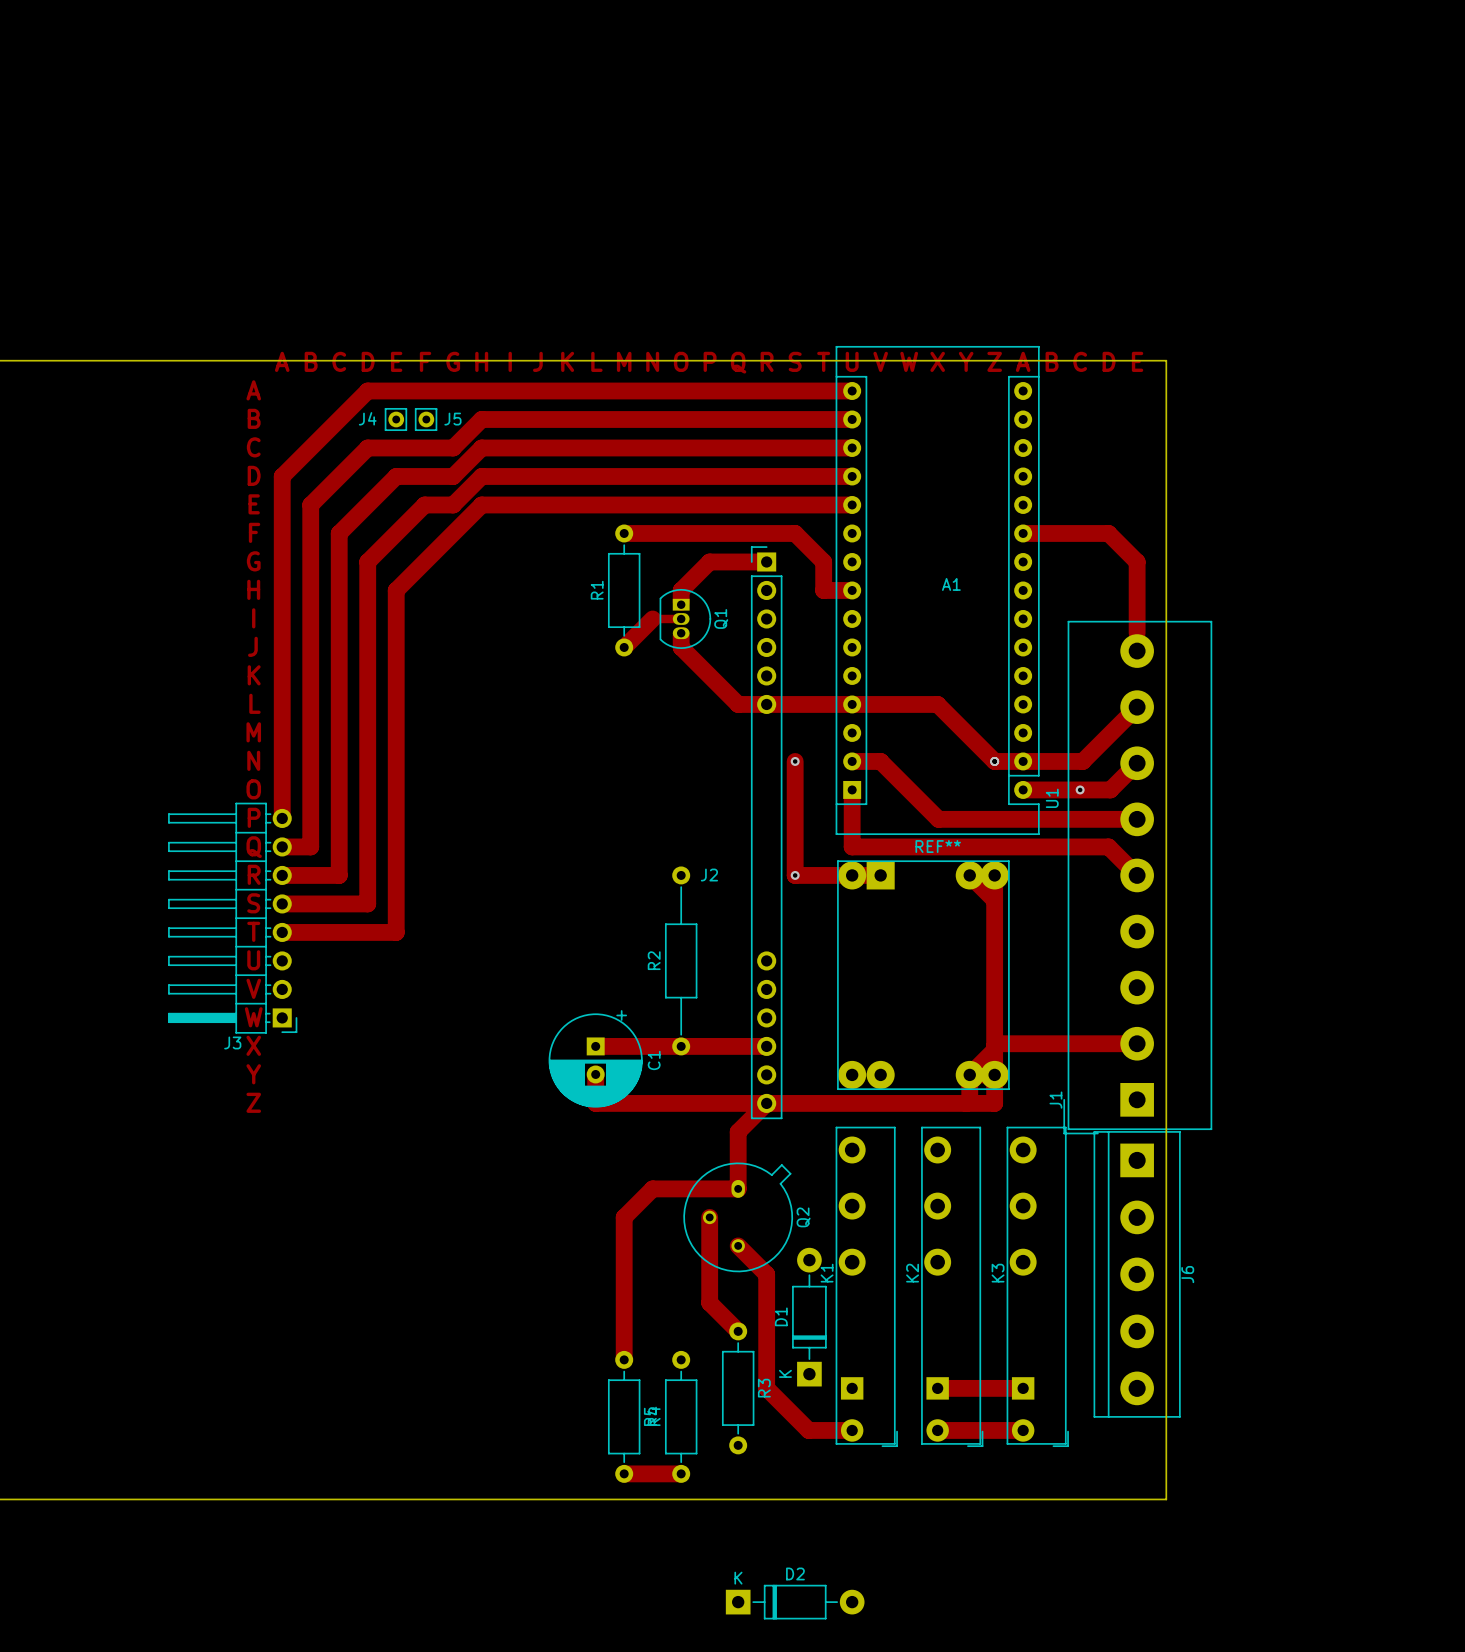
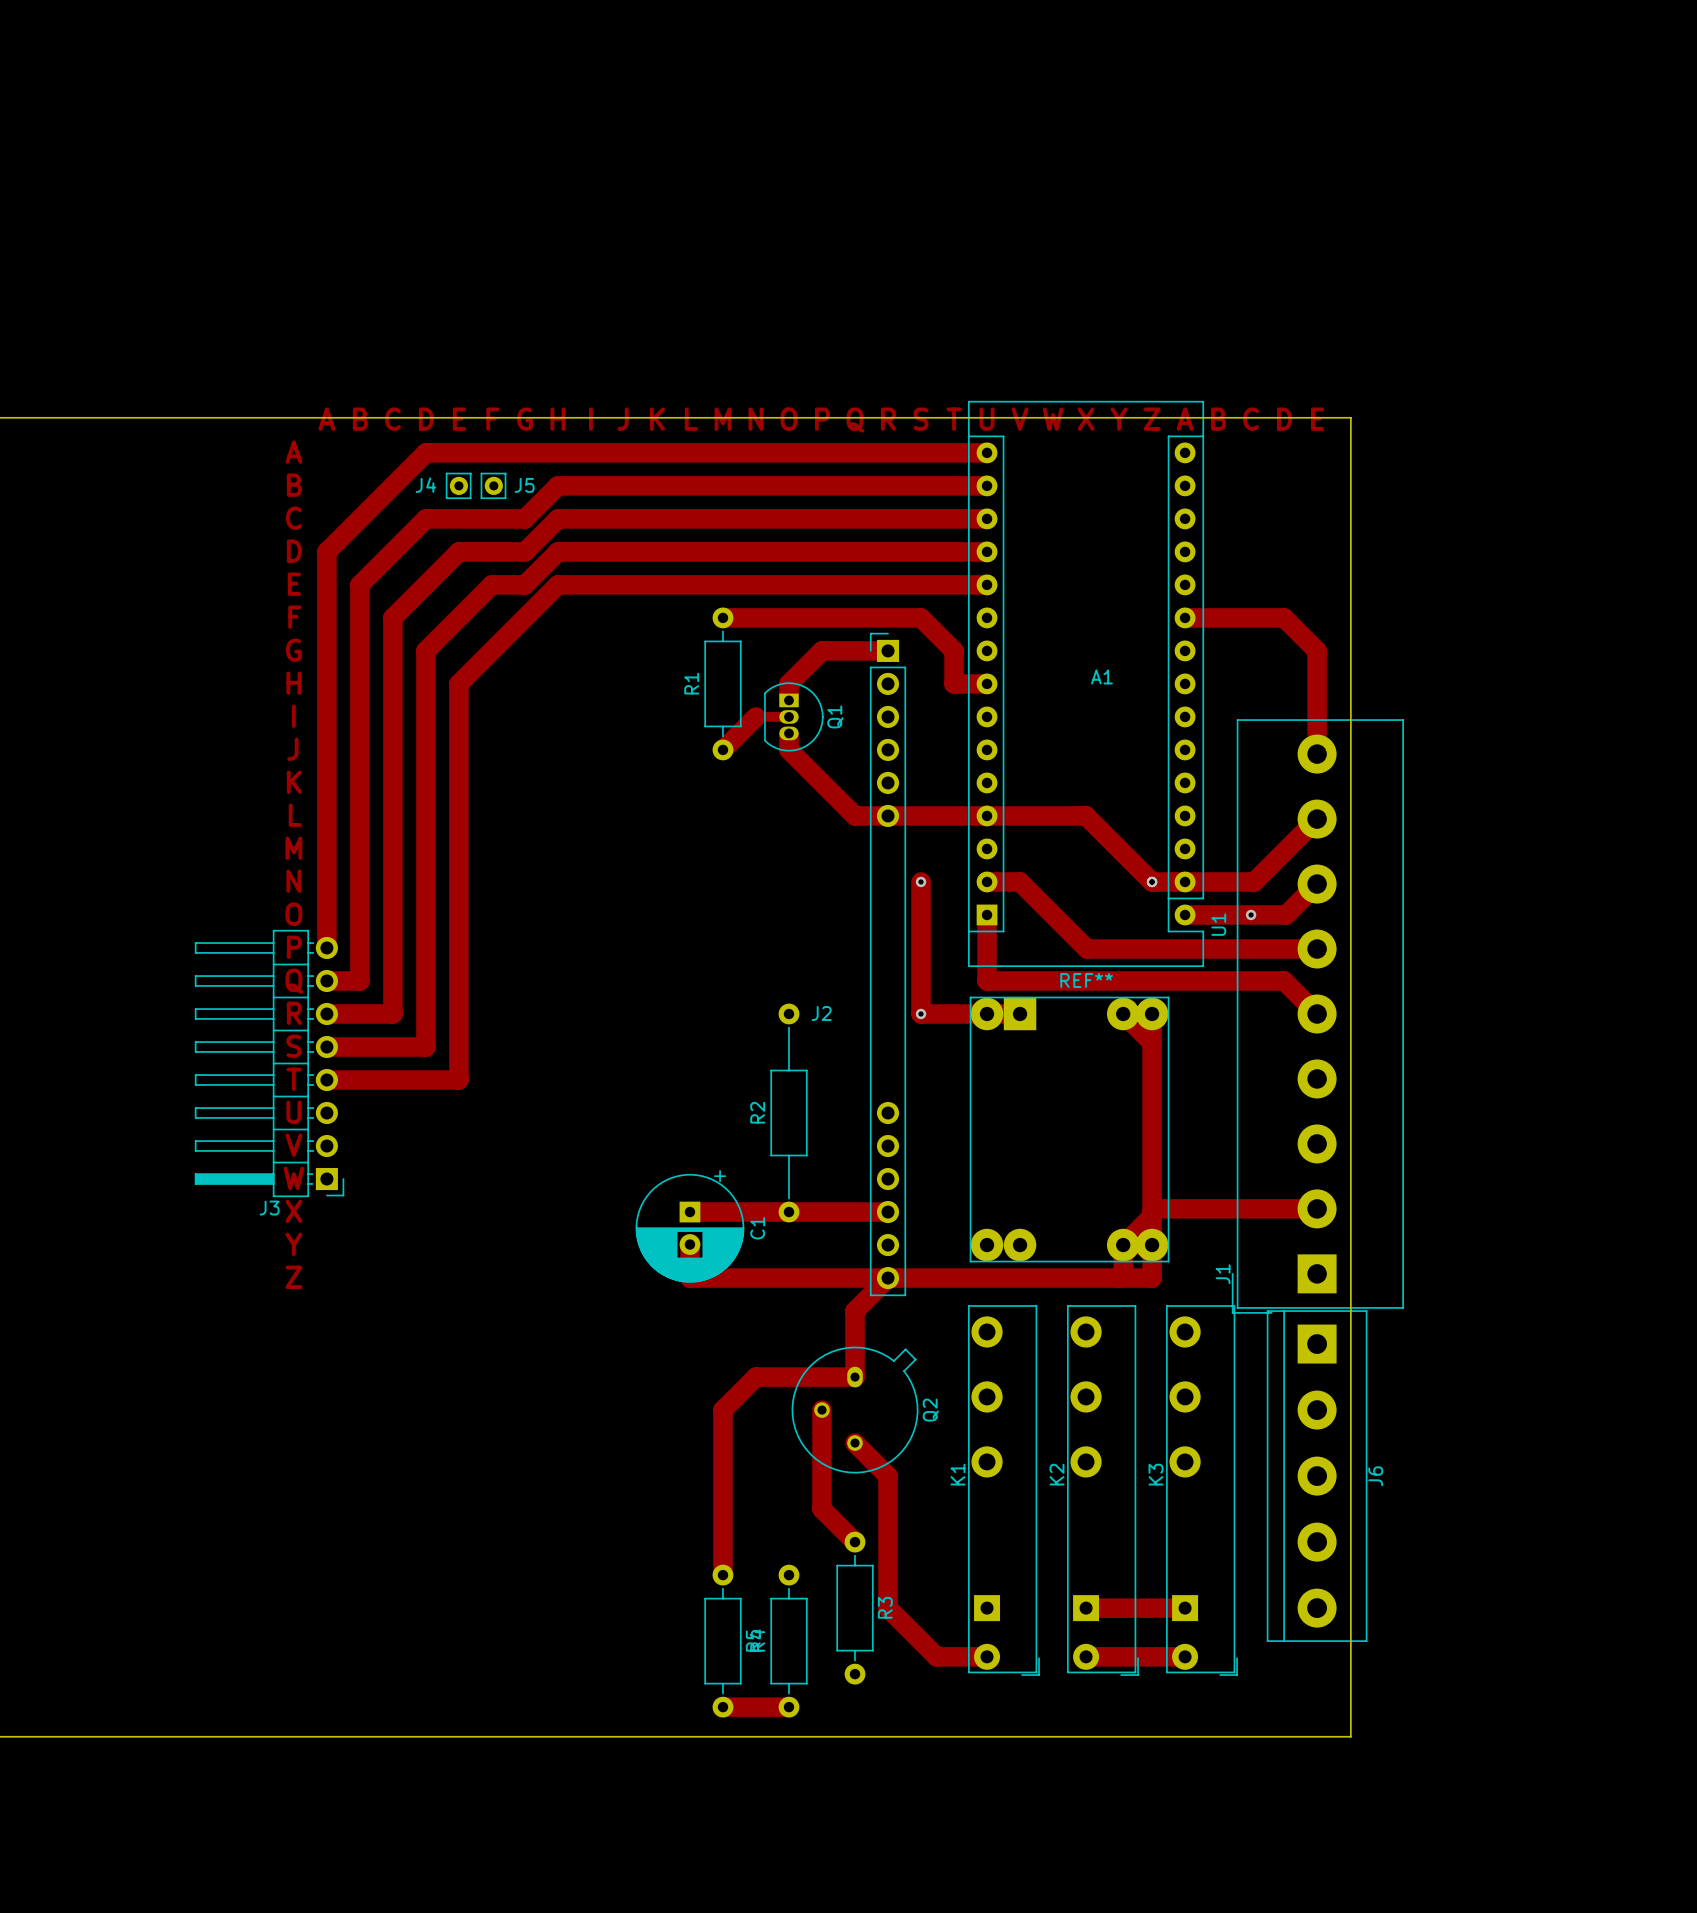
D1: (809, 1317) -> none
D2: (795, 1602) -> none

